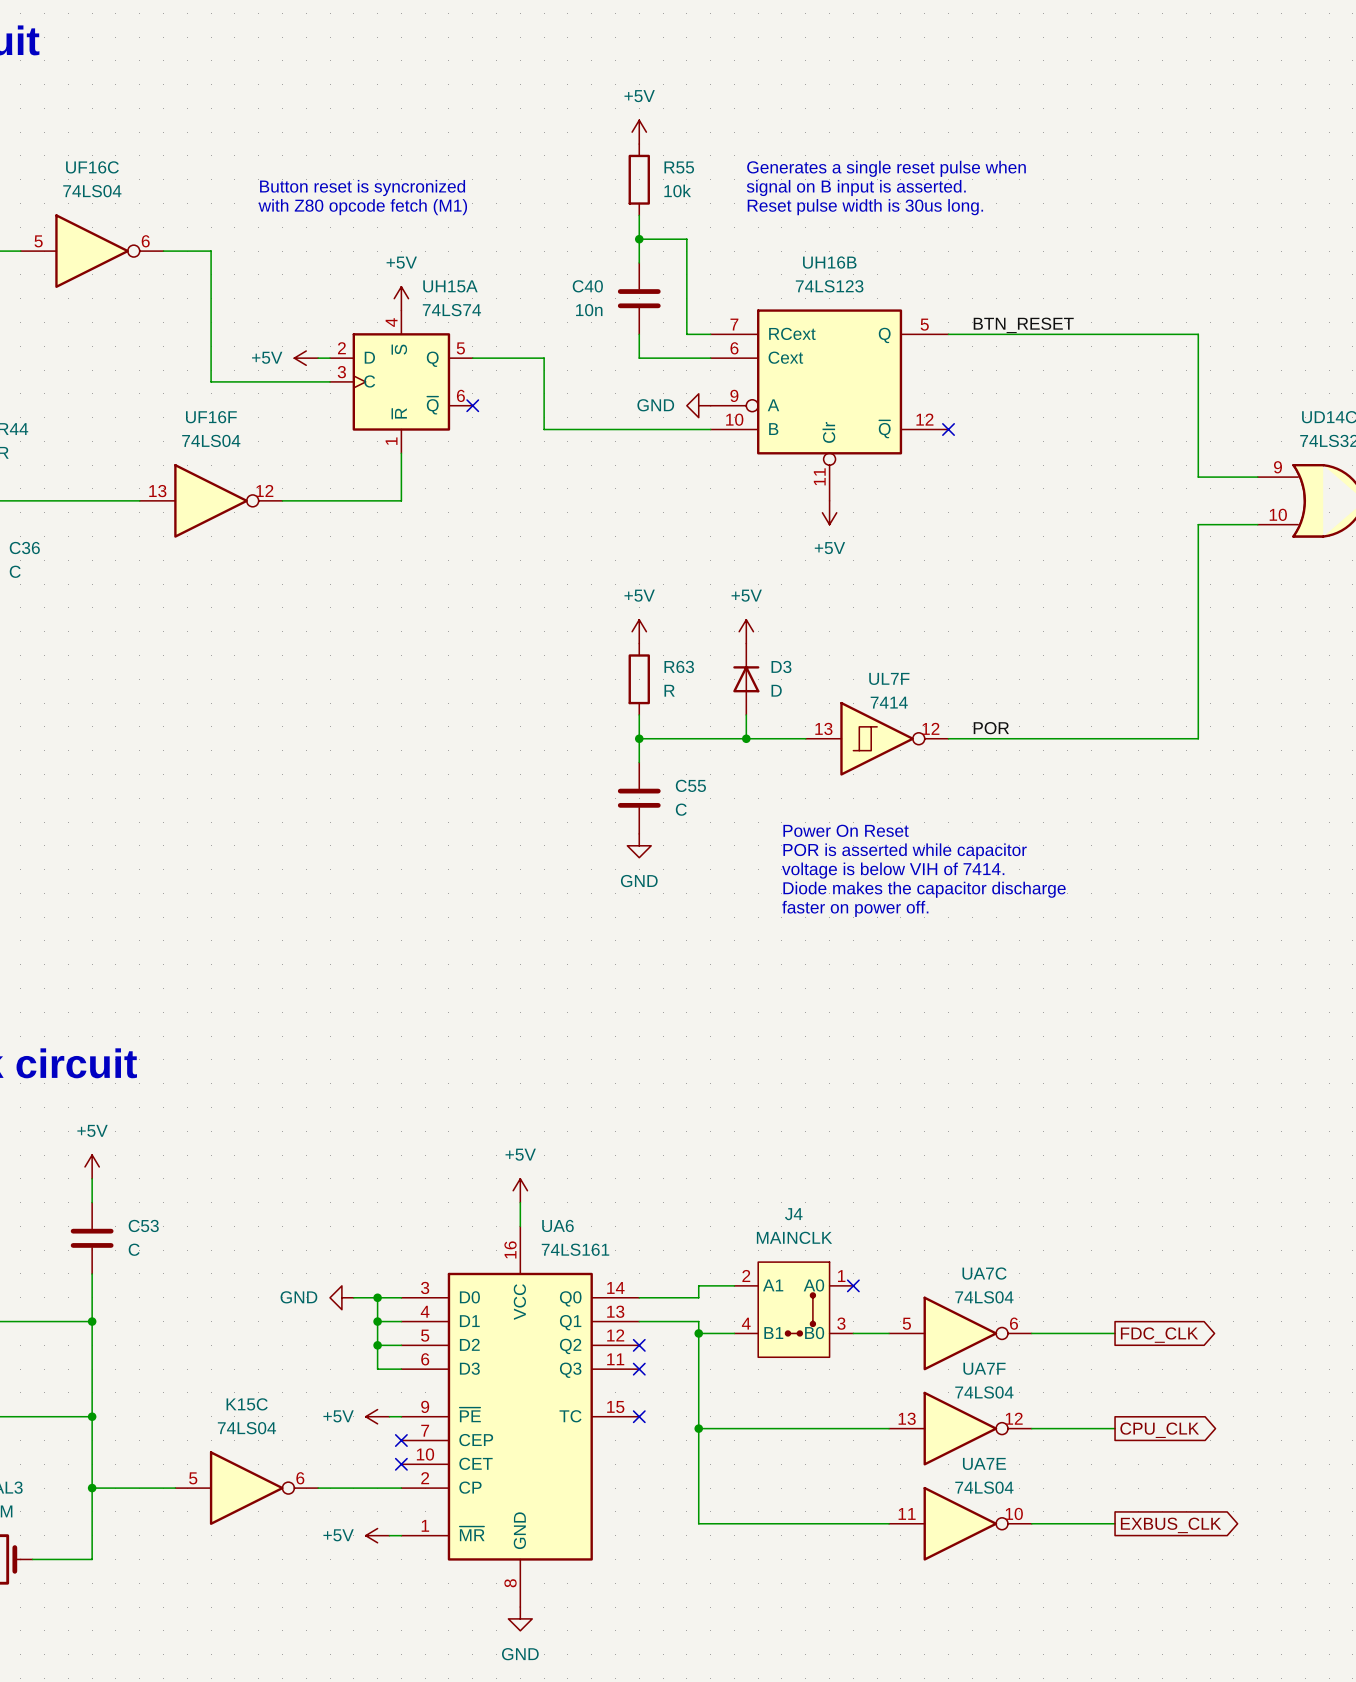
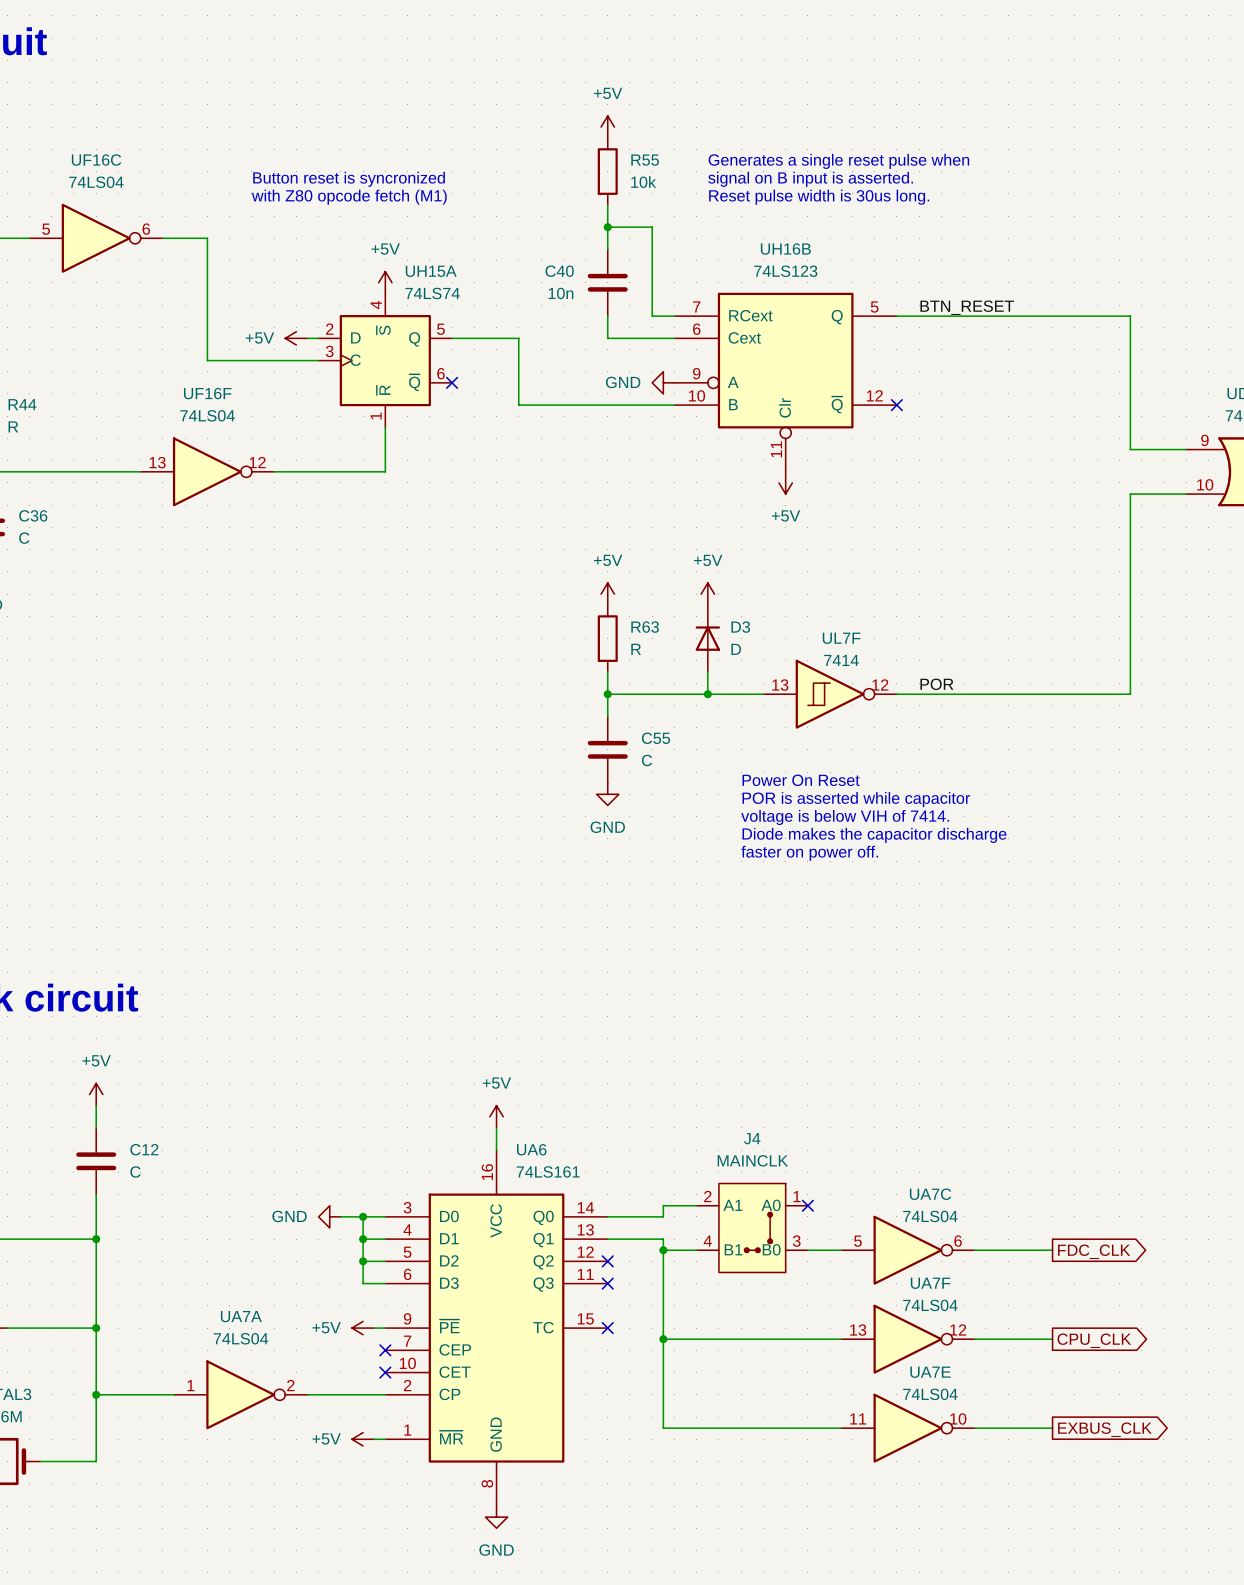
C53 name: C53 (143, 1225) -> C12 (144, 1149)
K15C name: K15C (247, 1404) -> UA7A (241, 1316)
K15C pin number: 5 (193, 1478) -> 1 (190, 1385)
K15C pin number: 6 (300, 1478) -> 2 (290, 1385)

